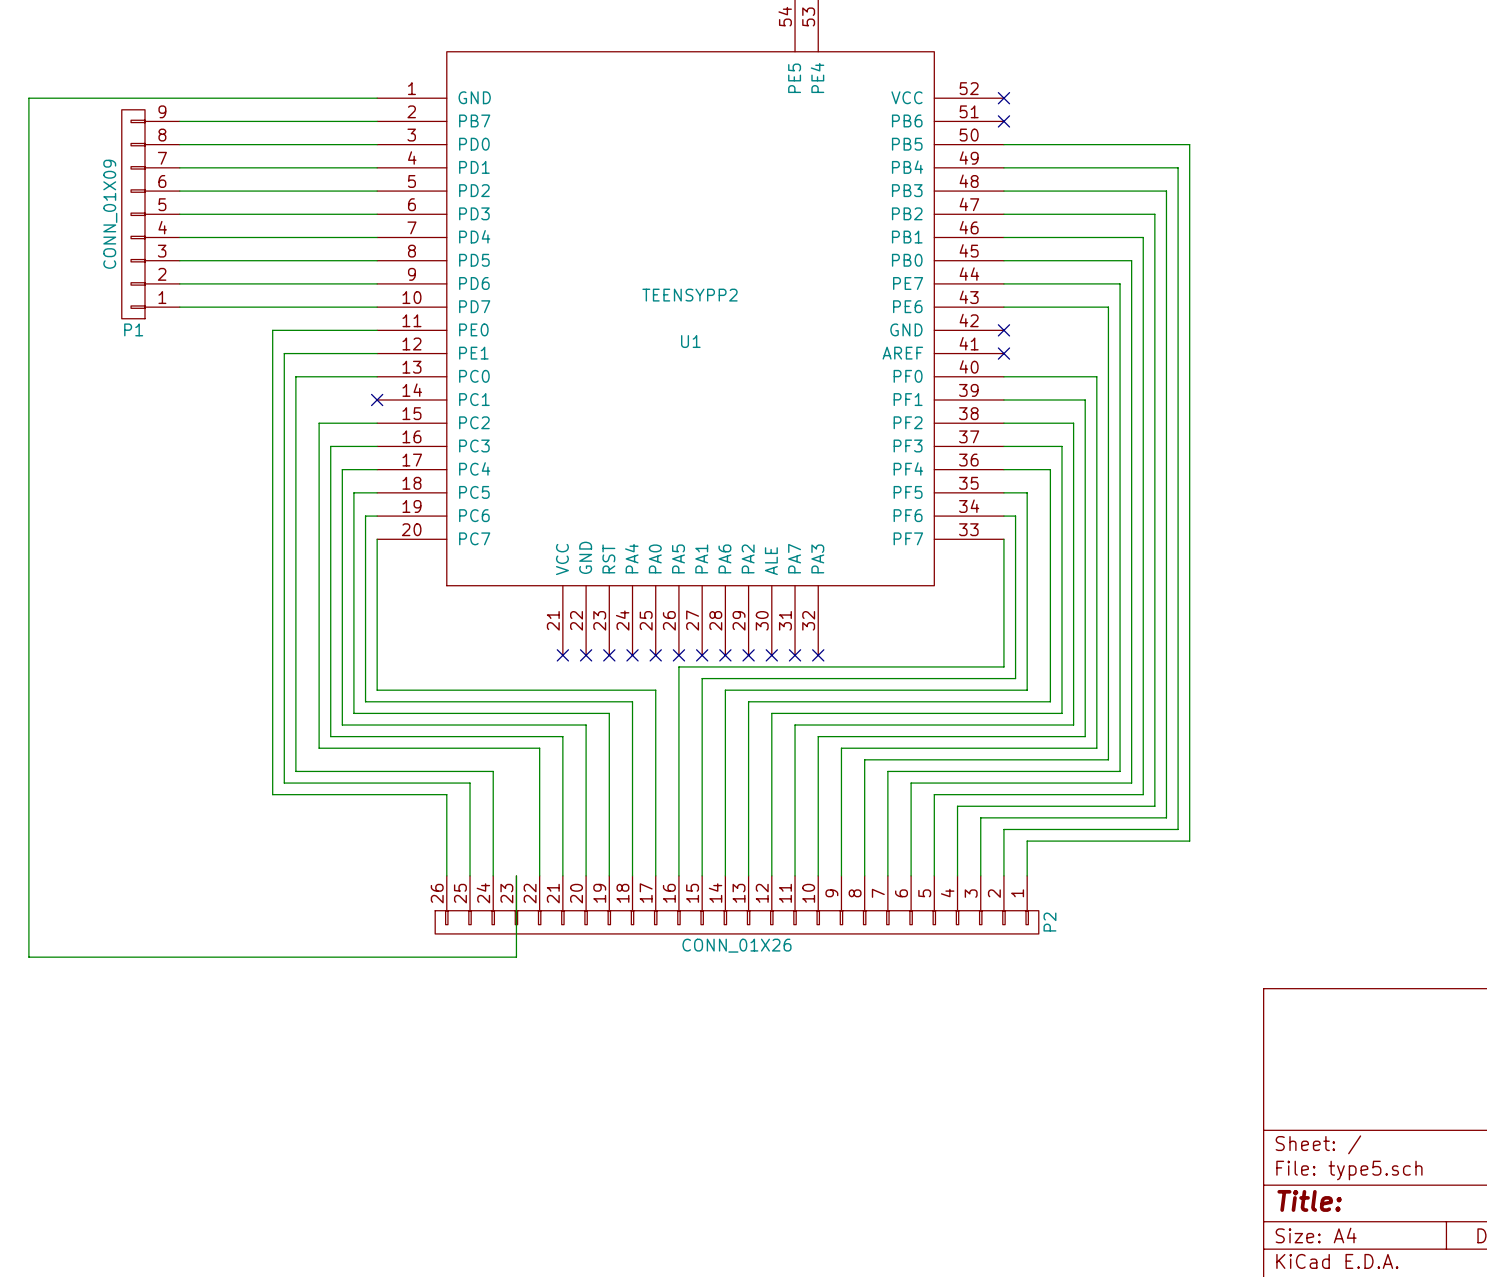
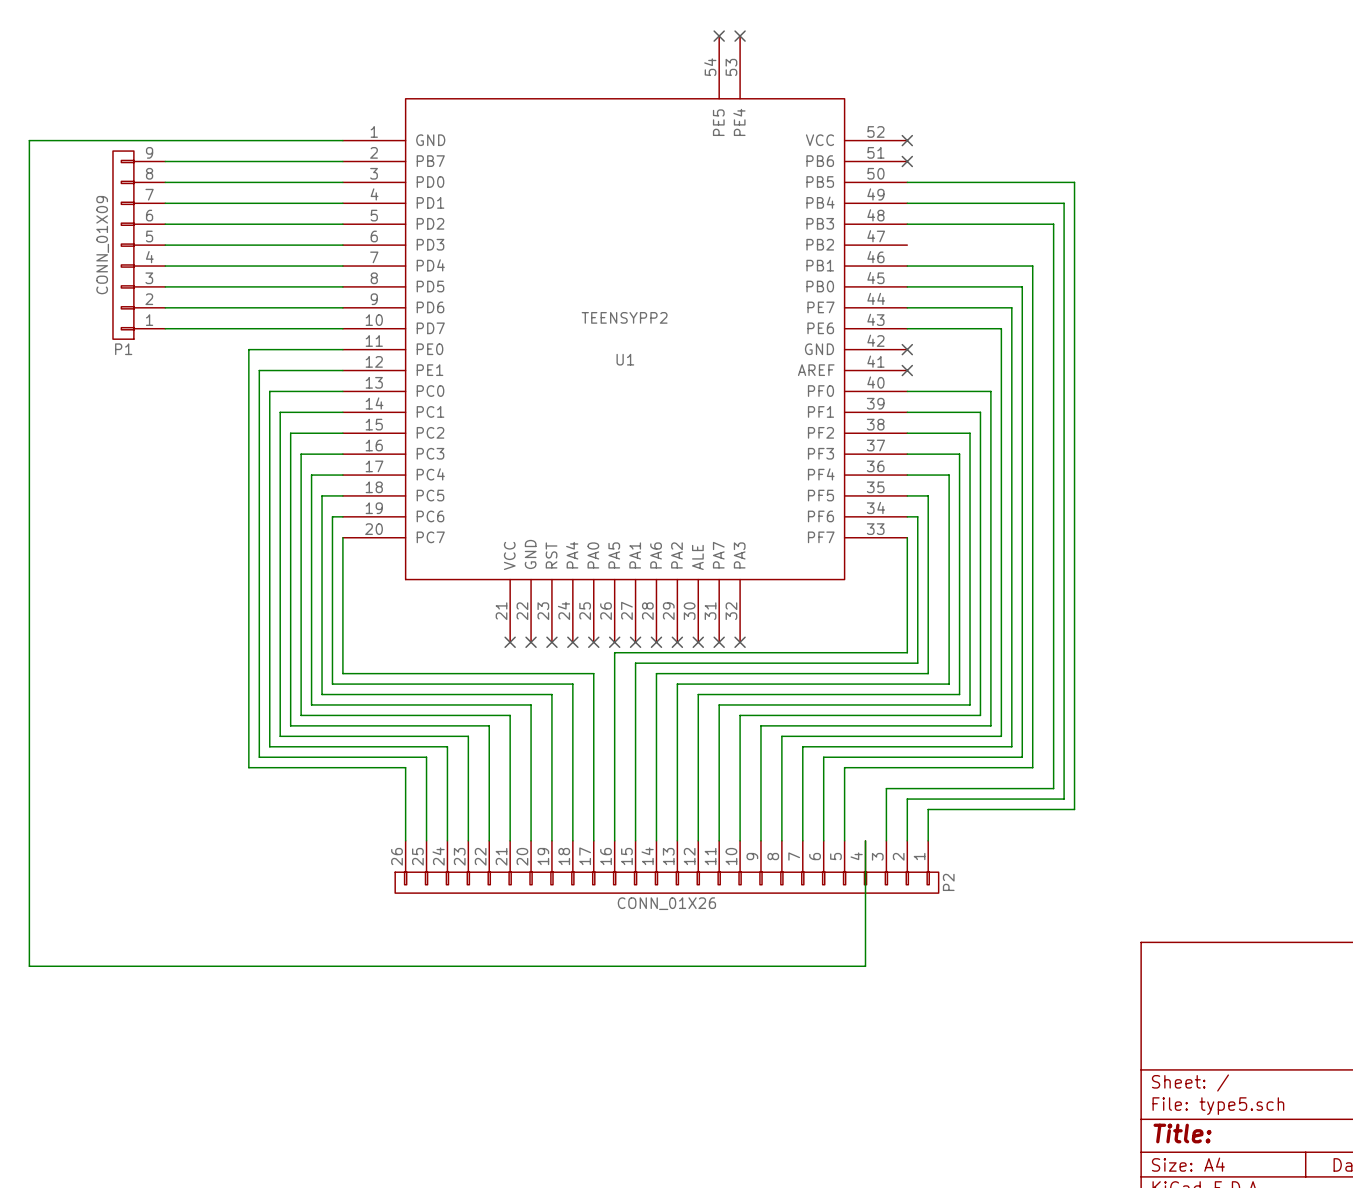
wire: (1003, 214) (1154, 214) (1154, 806) (957, 806) (957, 875) -> none
wire: none -> (342, 412) (280, 412) (280, 736) (468, 736) (468, 840)
no-connect mark: (377, 399) -> none
wire: (516, 875) (516, 957) (28, 957) -> (865, 840) (865, 966) (29, 966) (29, 914)

